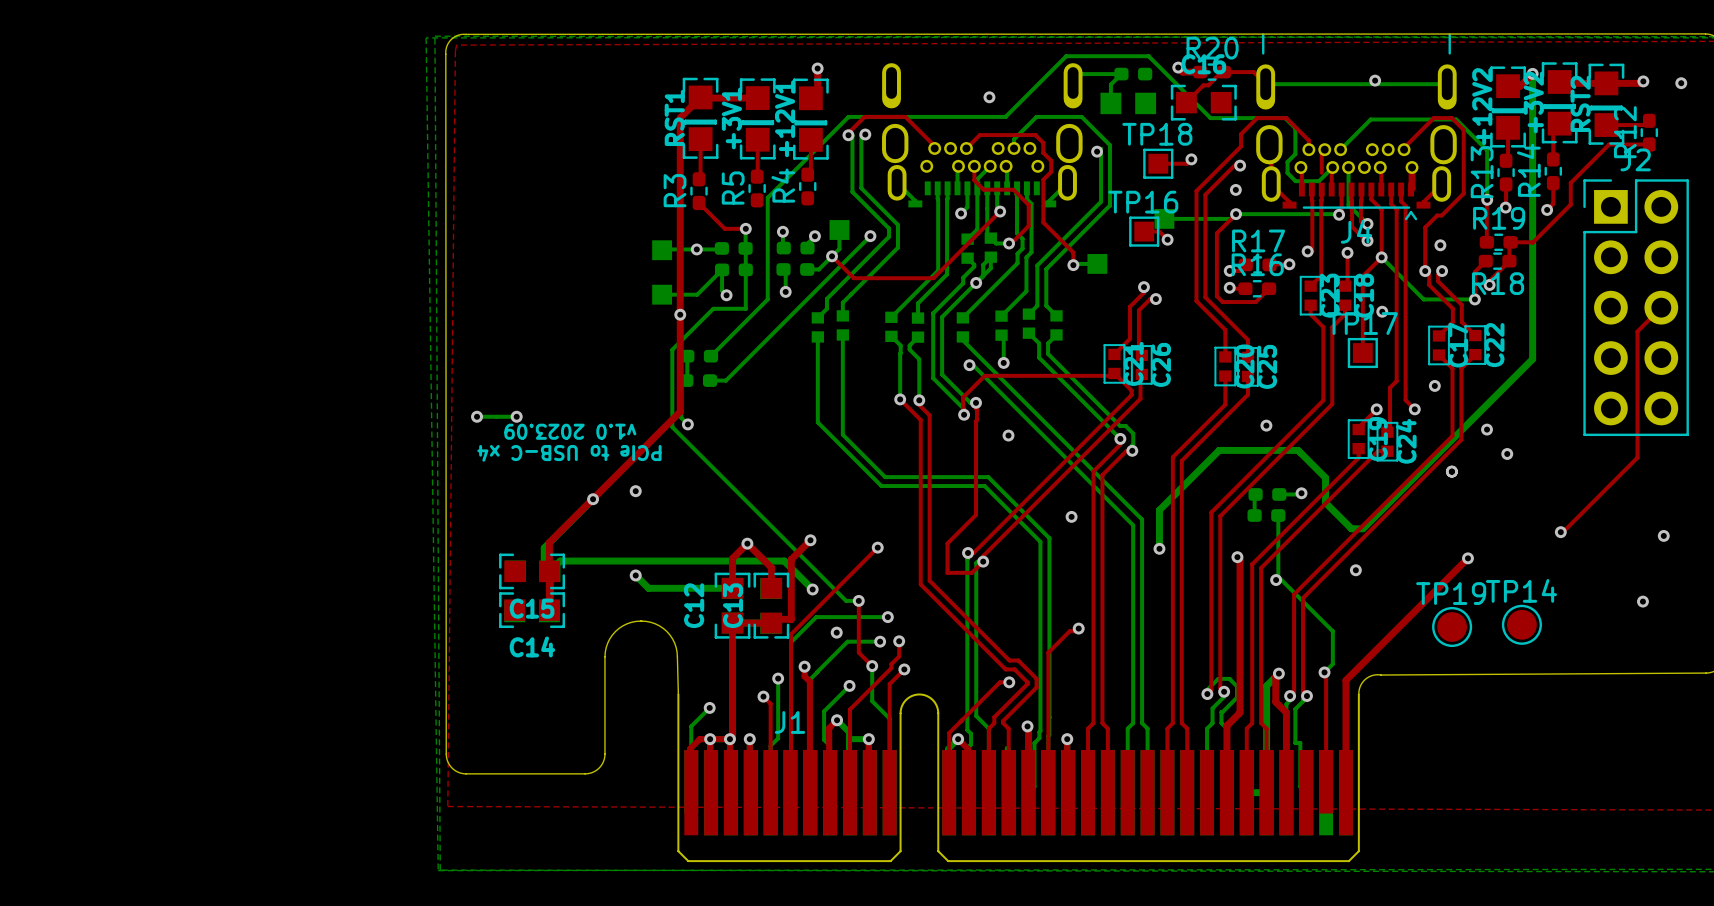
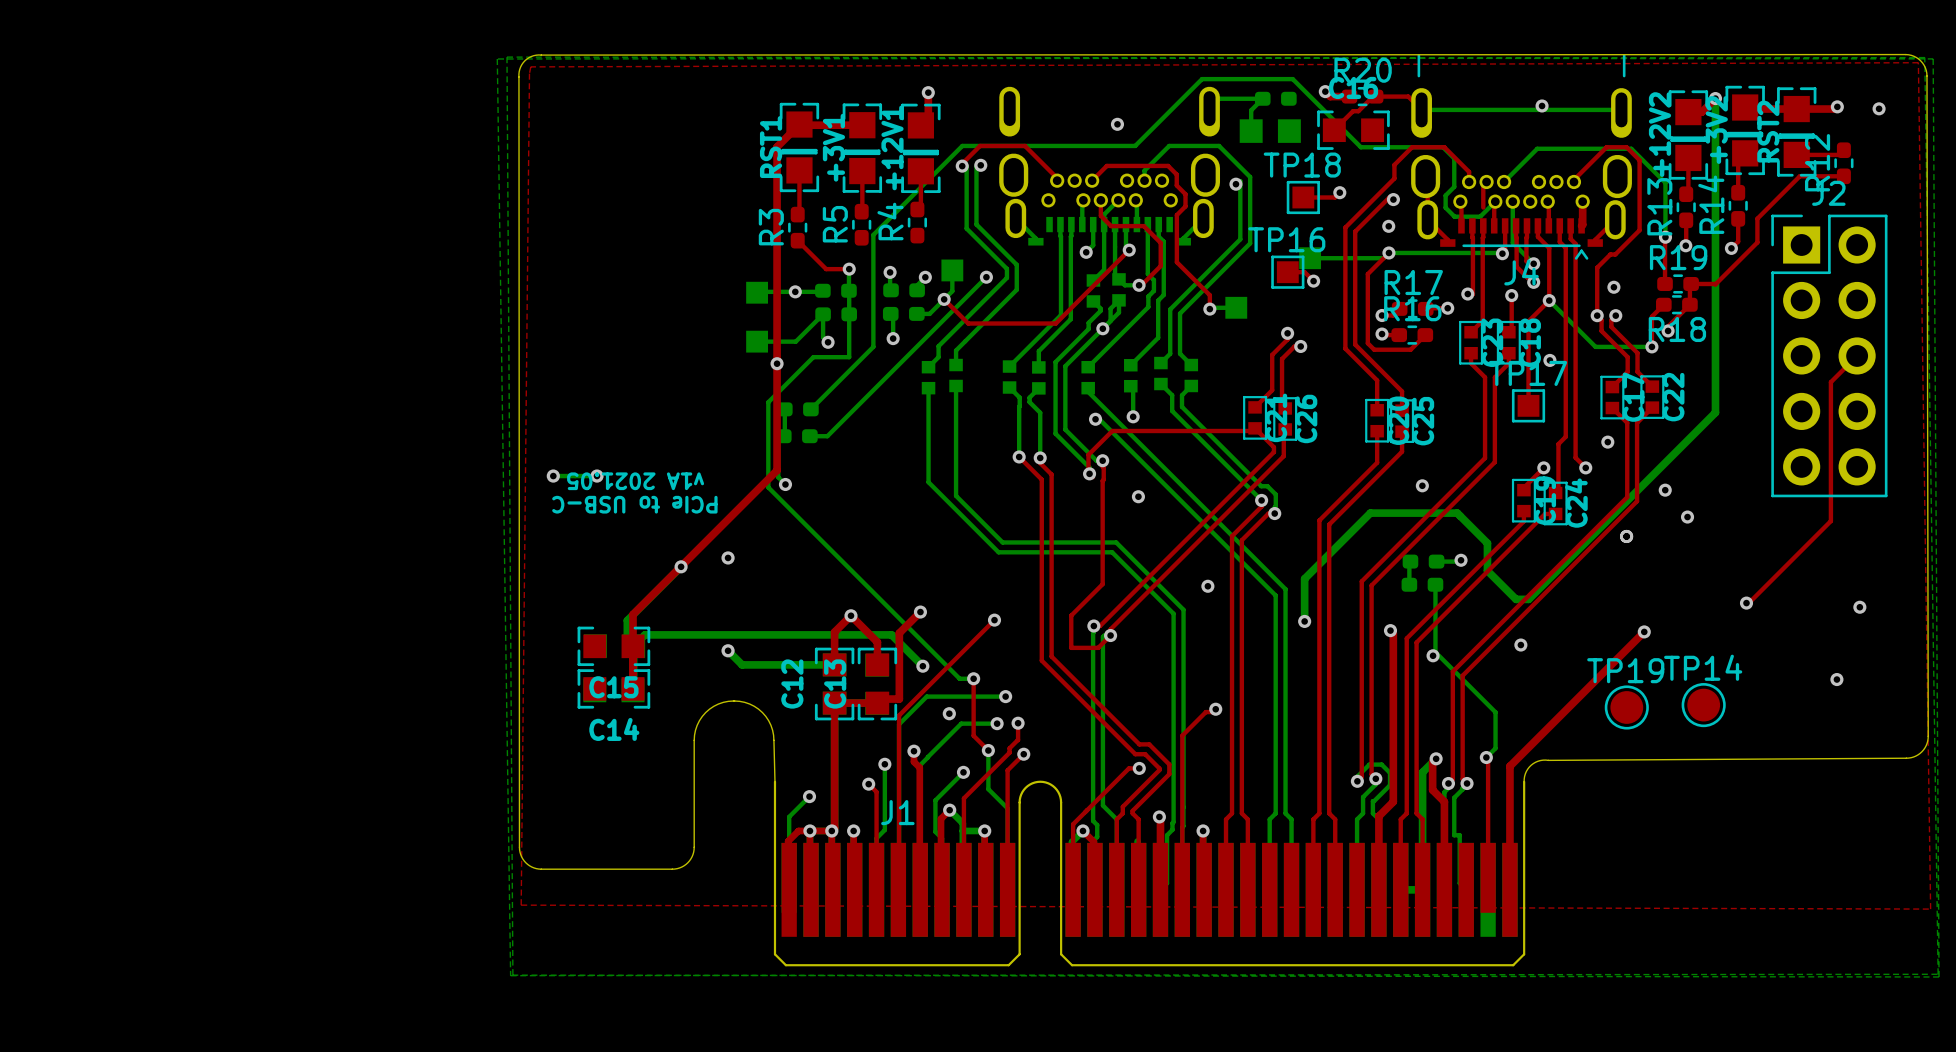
text: v1.0 2023.09 (570, 431) -> v1A 2021.05 (635, 481)
text: PCIe to USB-C x4 (569, 453) -> PCIe to USB-C (634, 504)

